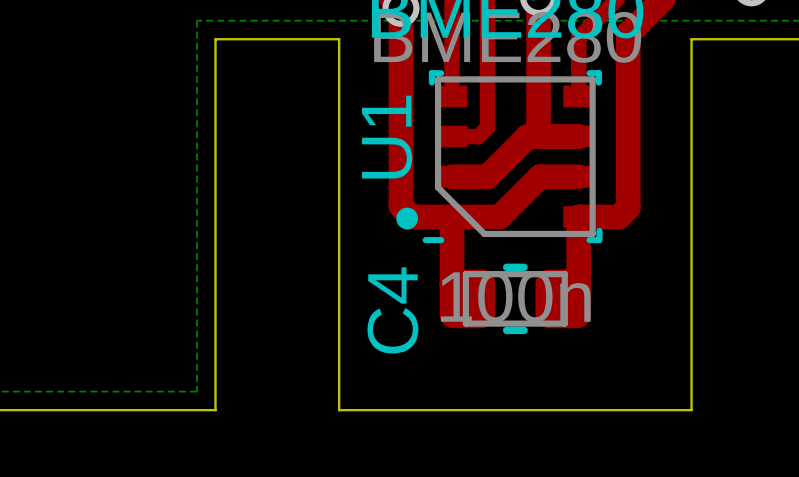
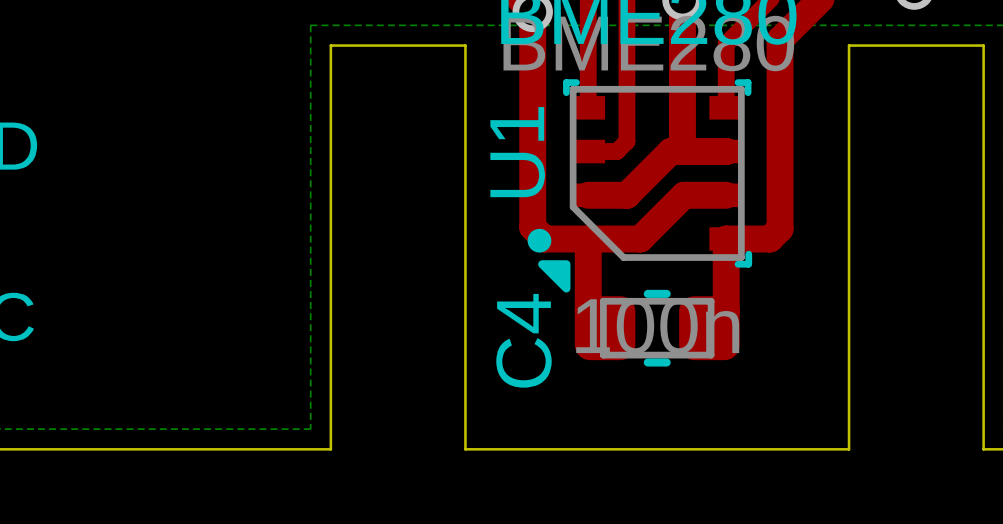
U1 footprint: [422, 70, 603, 244] -> [538, 79, 753, 293]

